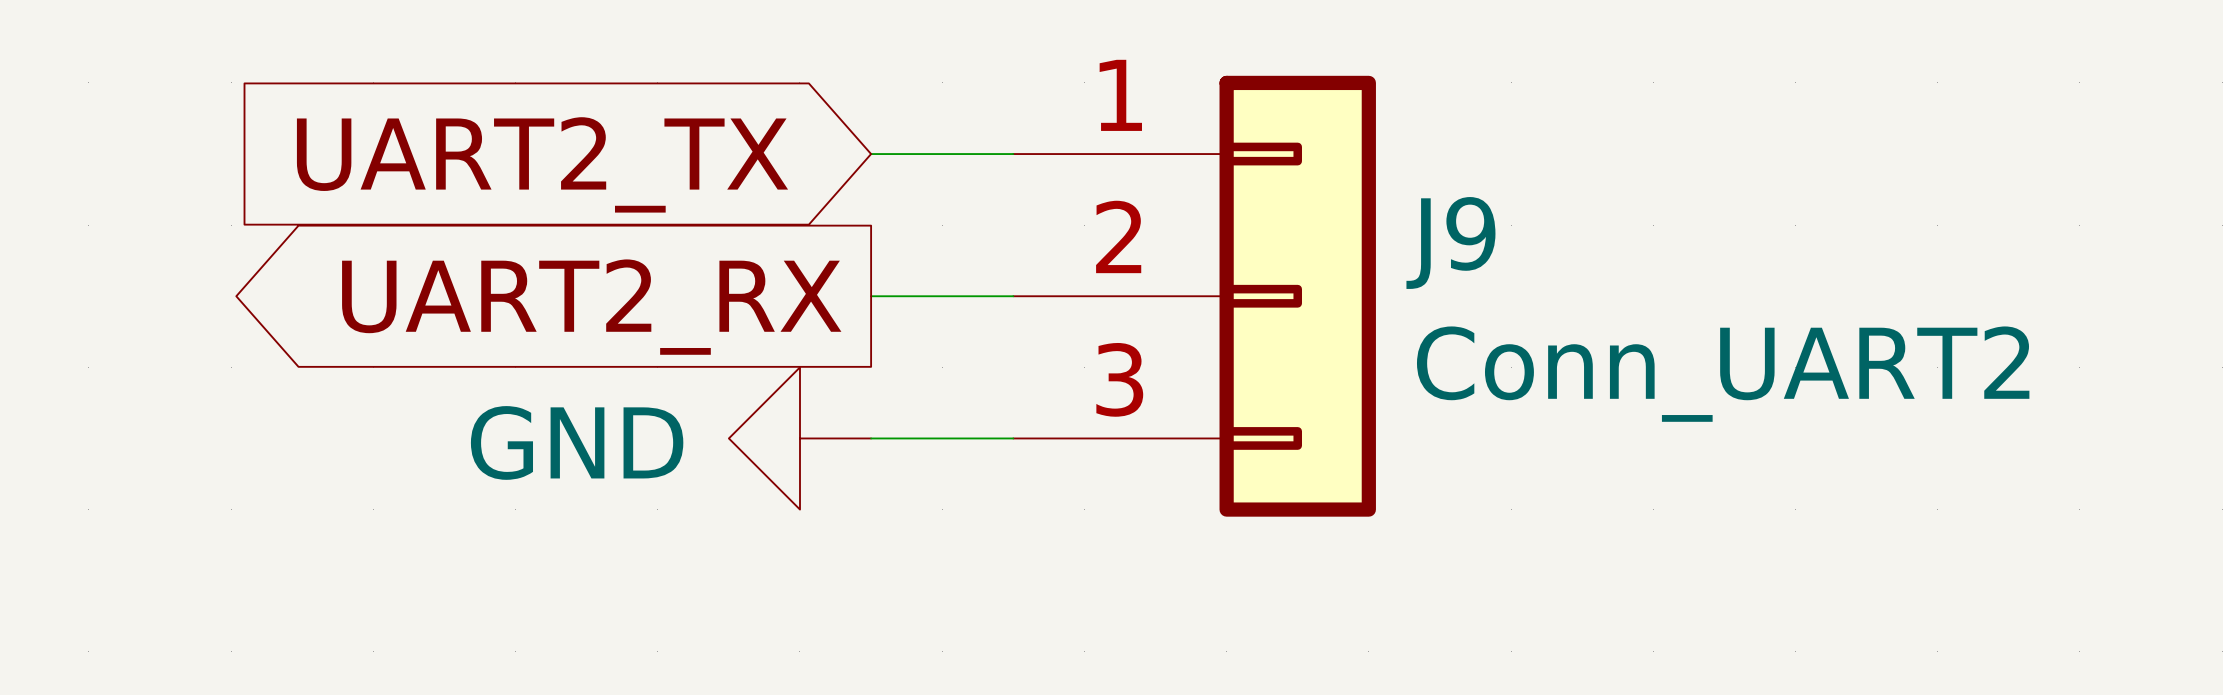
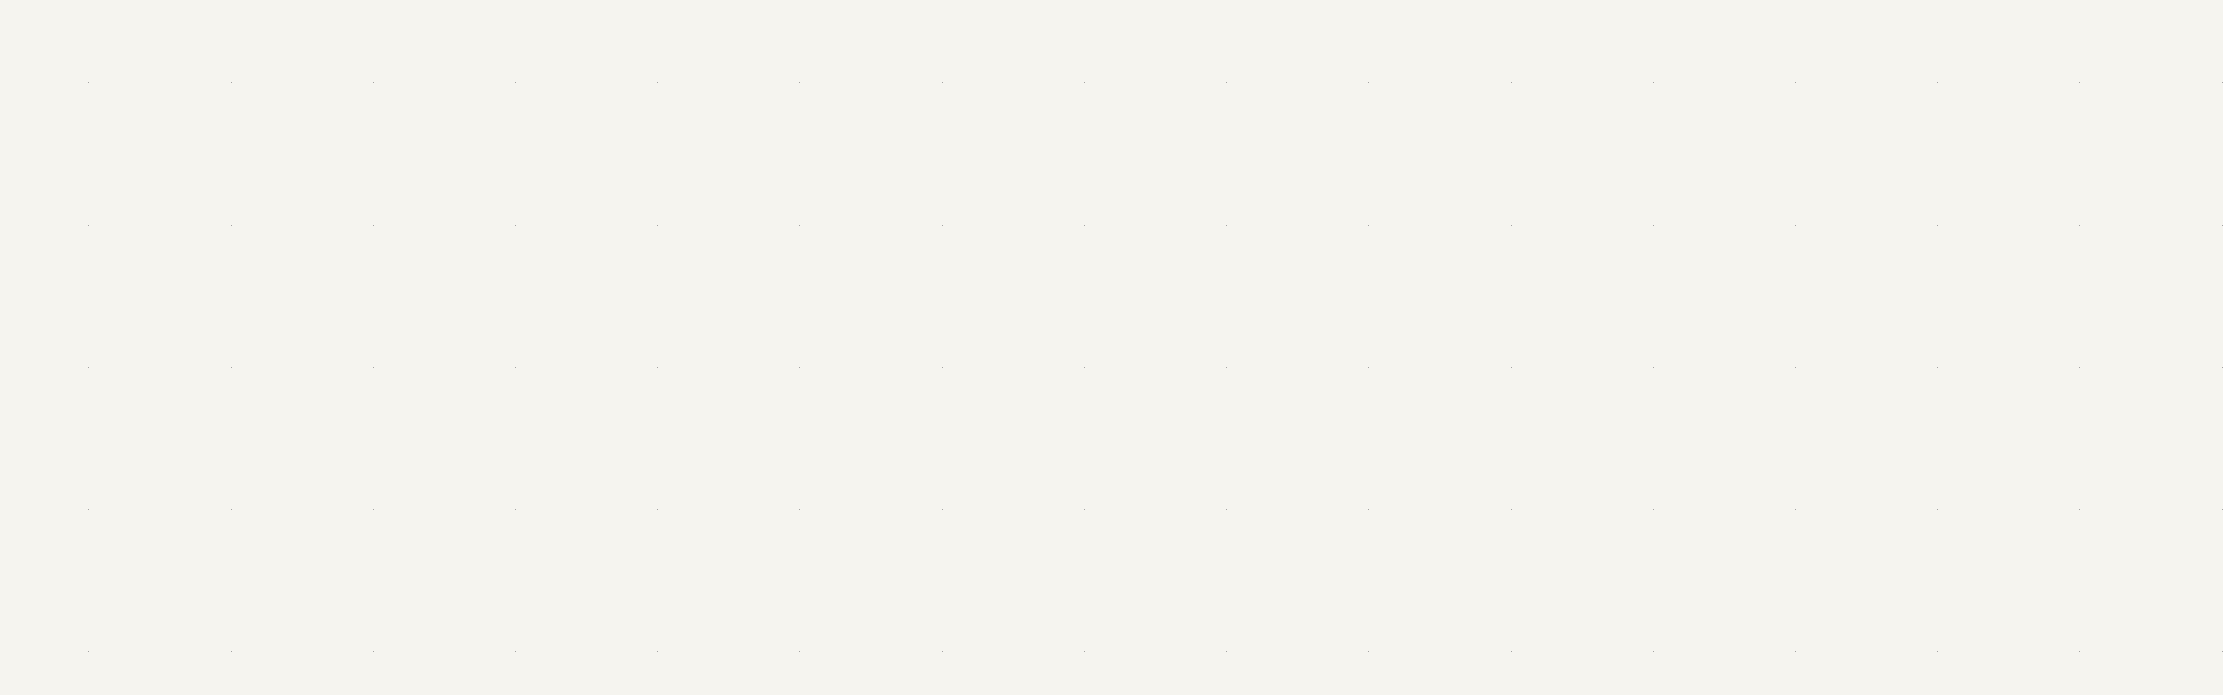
wire: (871, 154) (1013, 154) -> none
global label: UART2_TX (542, 164) -> none
wire: (871, 296) (1013, 296) -> none
J9: Conn_UART2 (1194, 296) -> none
global label: UART2_RX (591, 307) -> none
power symbol: GND (799, 438) -> none
wire: (871, 438) (1013, 438) -> none

